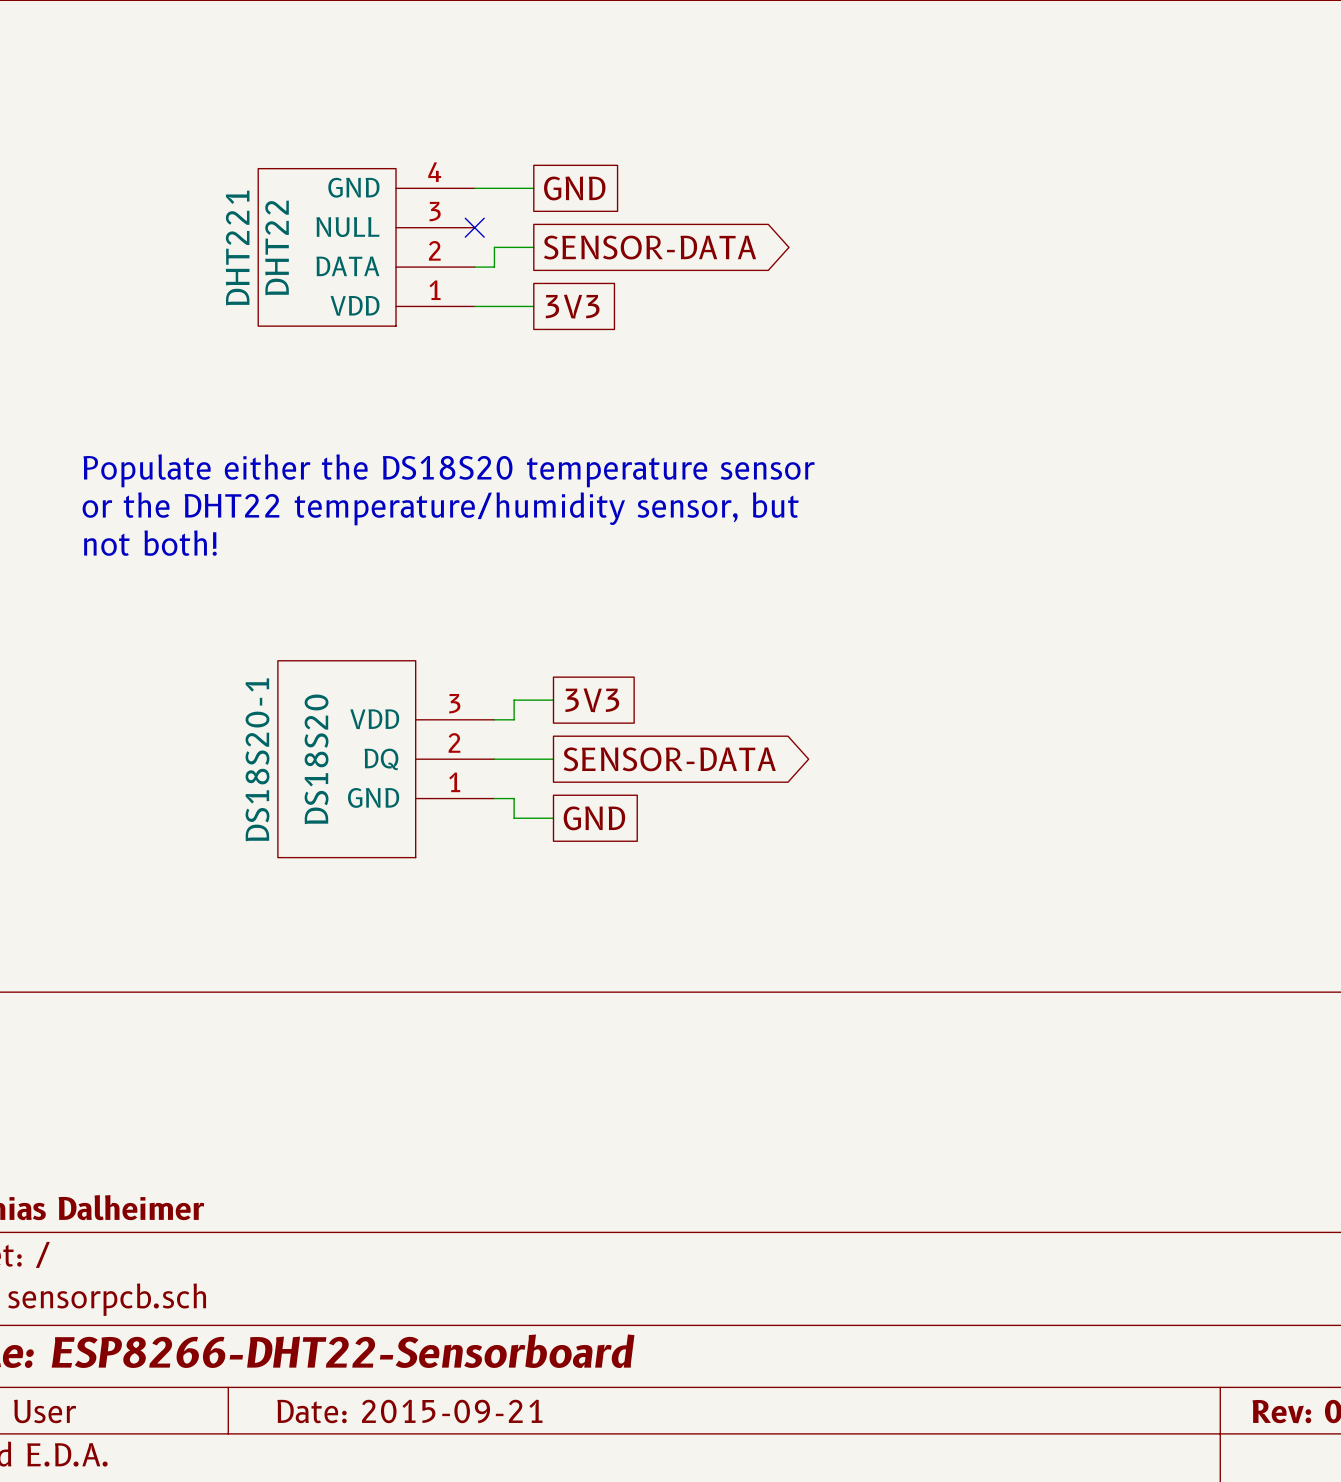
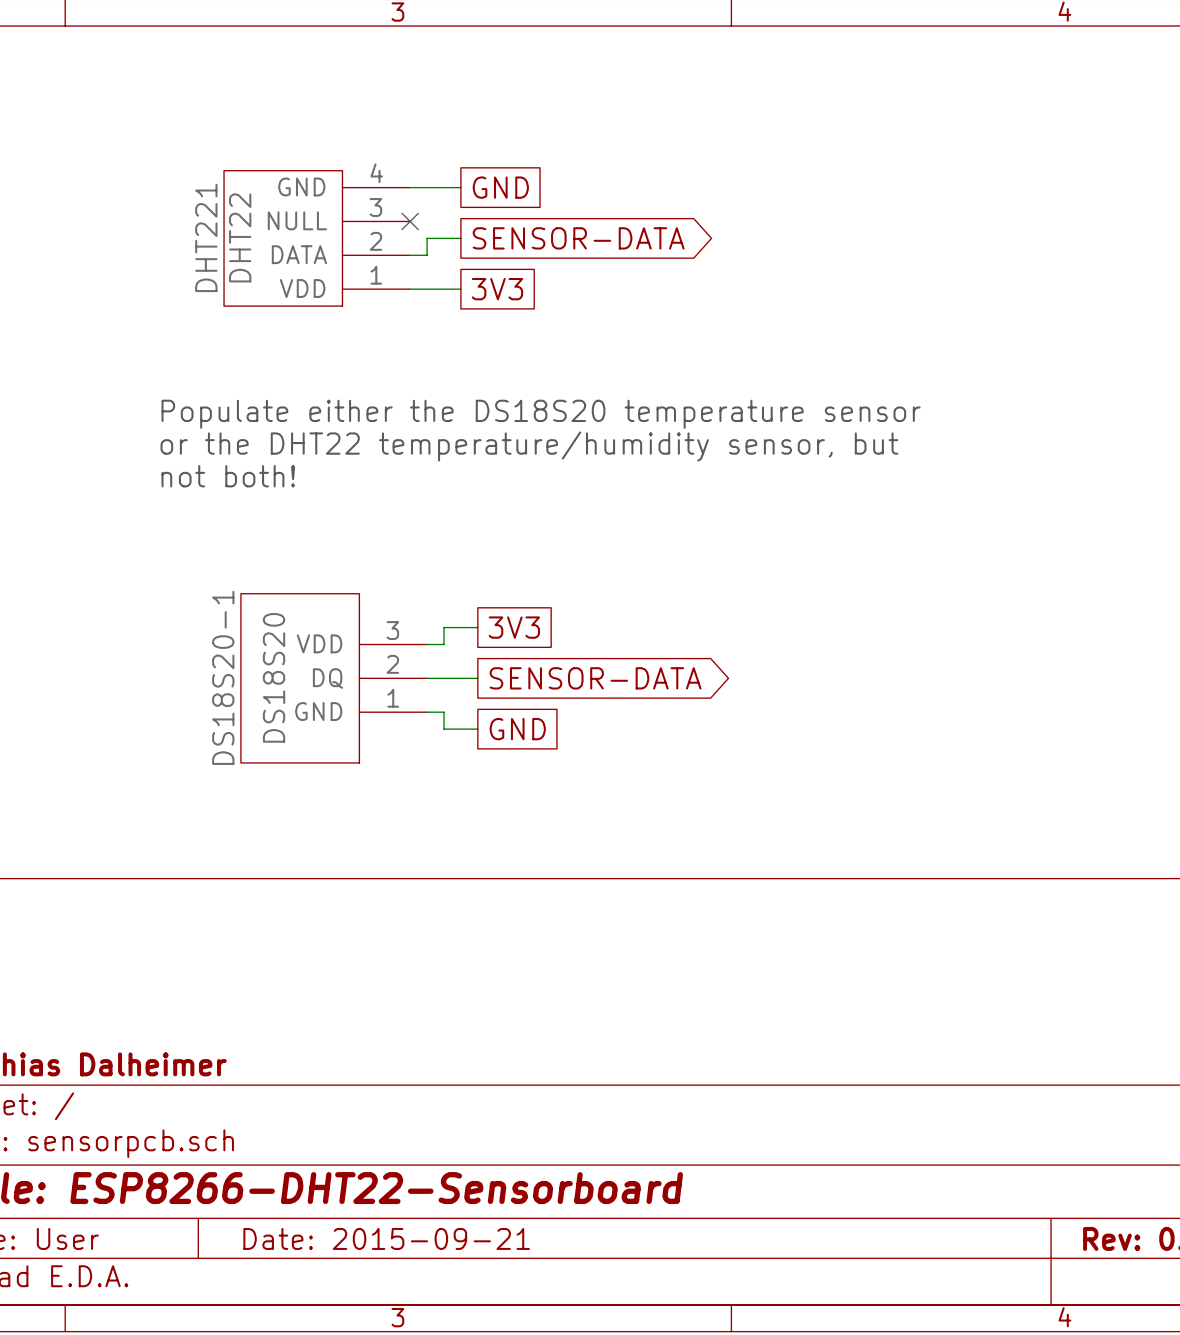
text position: Populate either the DS18S20 temperature sensor (449, 470) -> Populate either the DS18S20 temperature sensor (541, 414)
text position: or the DHT22 temperature/humidity sensor, but (440, 508) -> or the DHT22 temperature/humidity sensor, but (529, 446)
text position: not both! (150, 543) -> not both! (228, 476)

